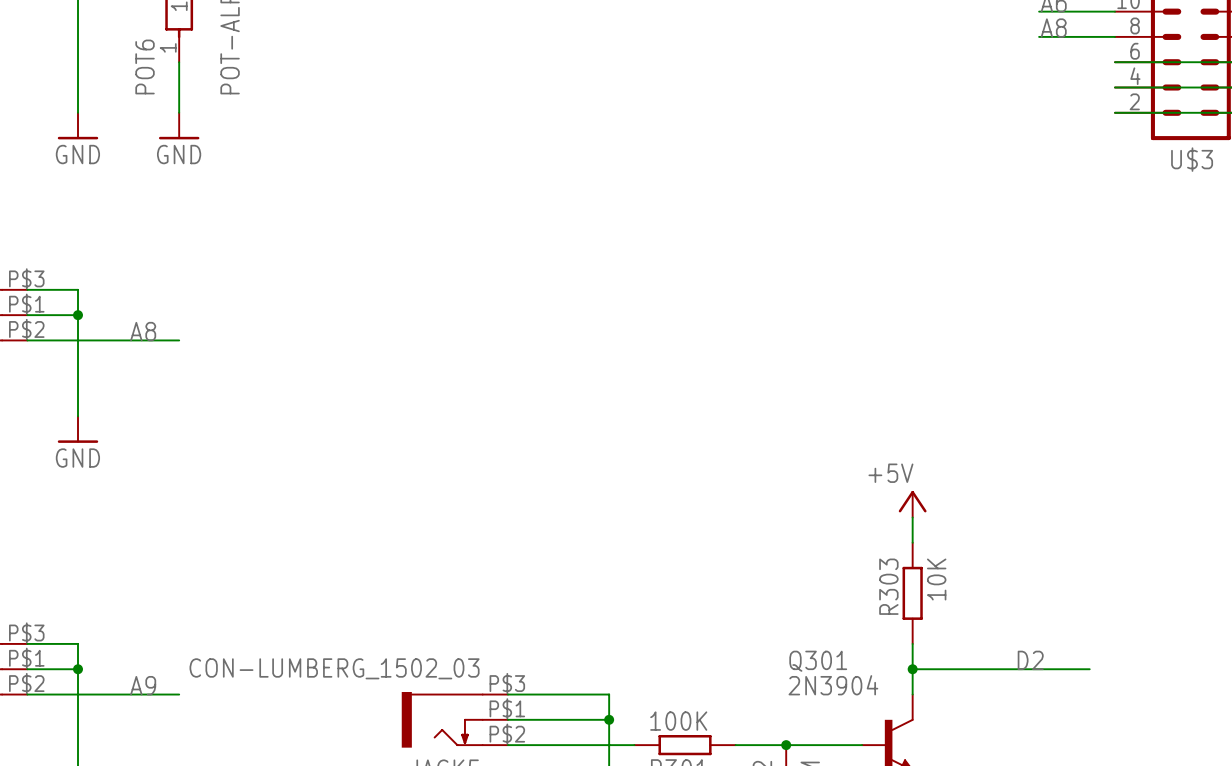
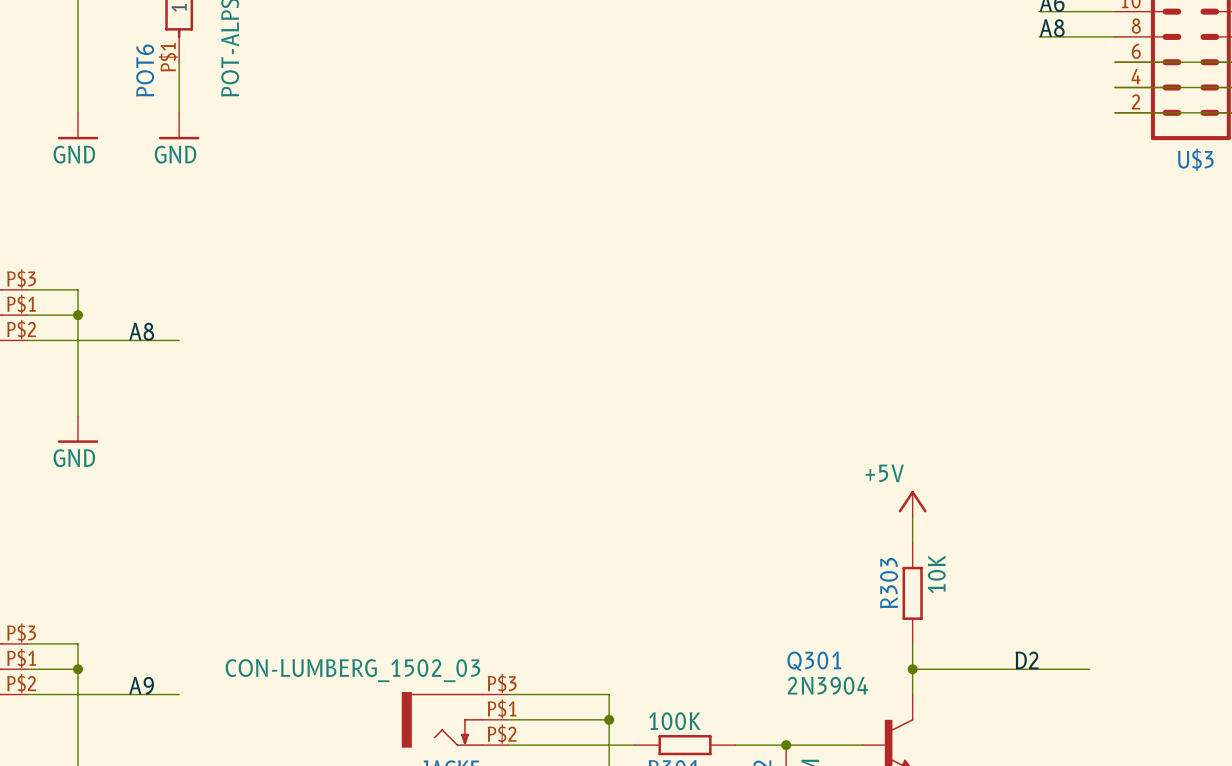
POT6 pin number: 1 (168, 47) -> P$1 (168, 57)

